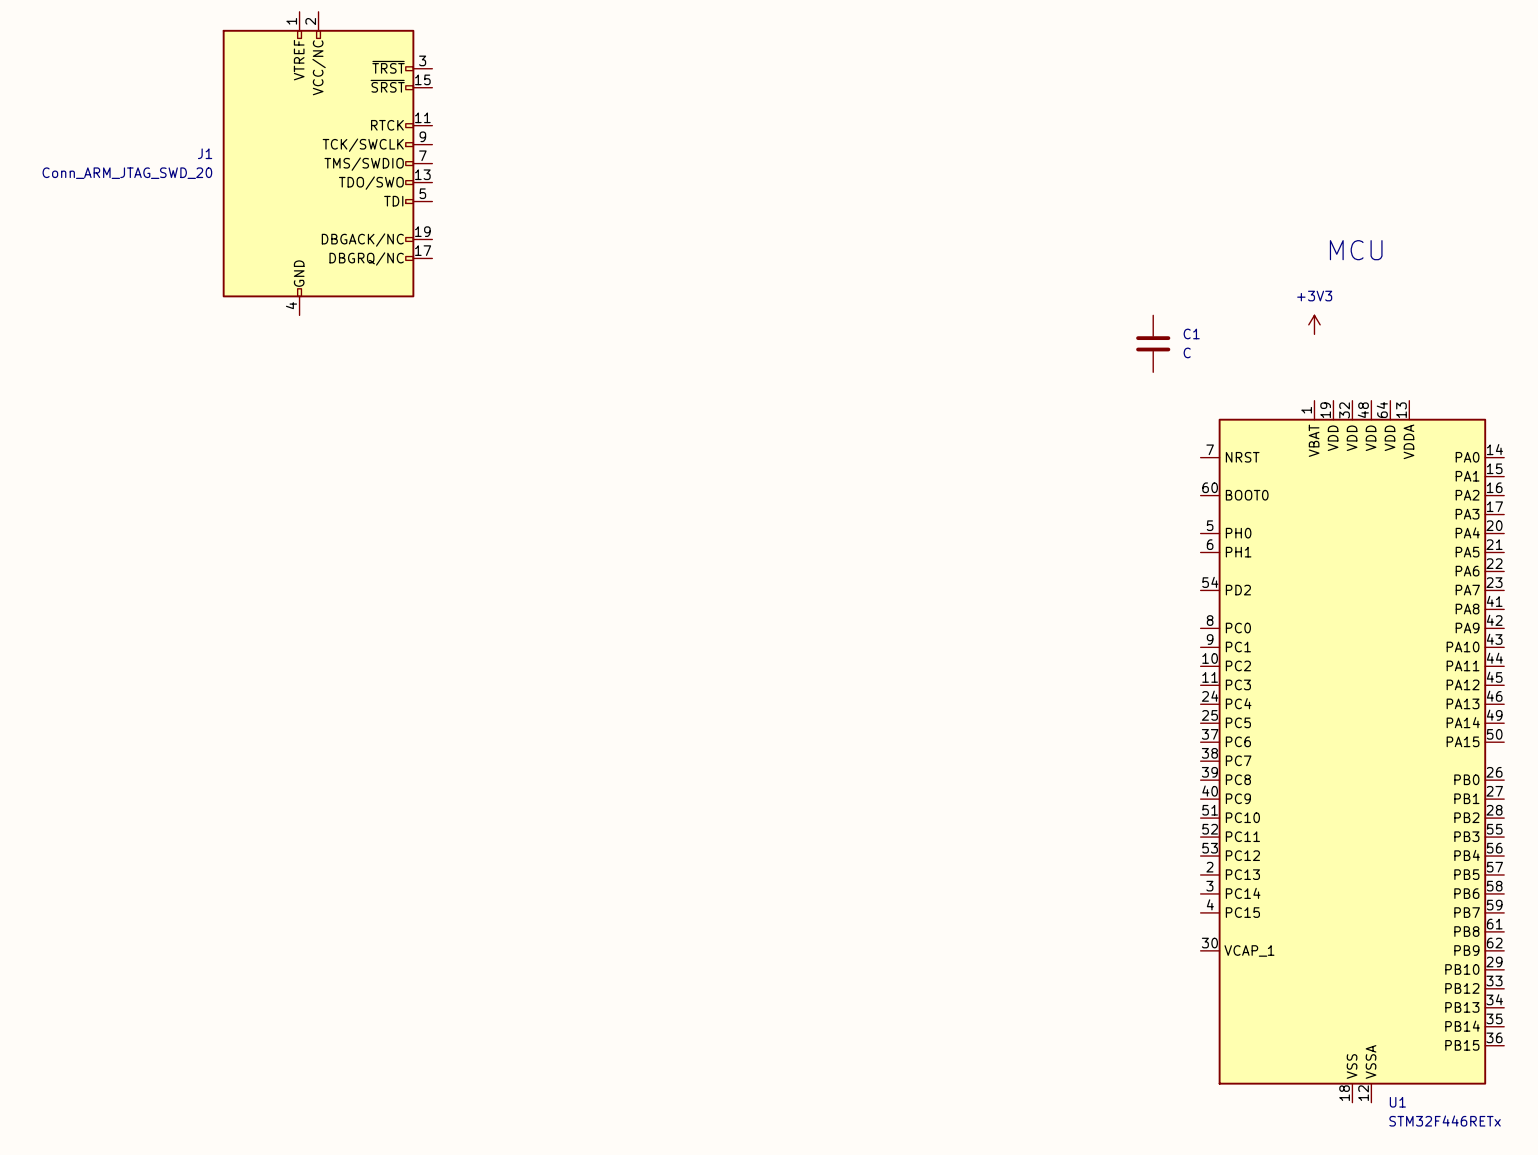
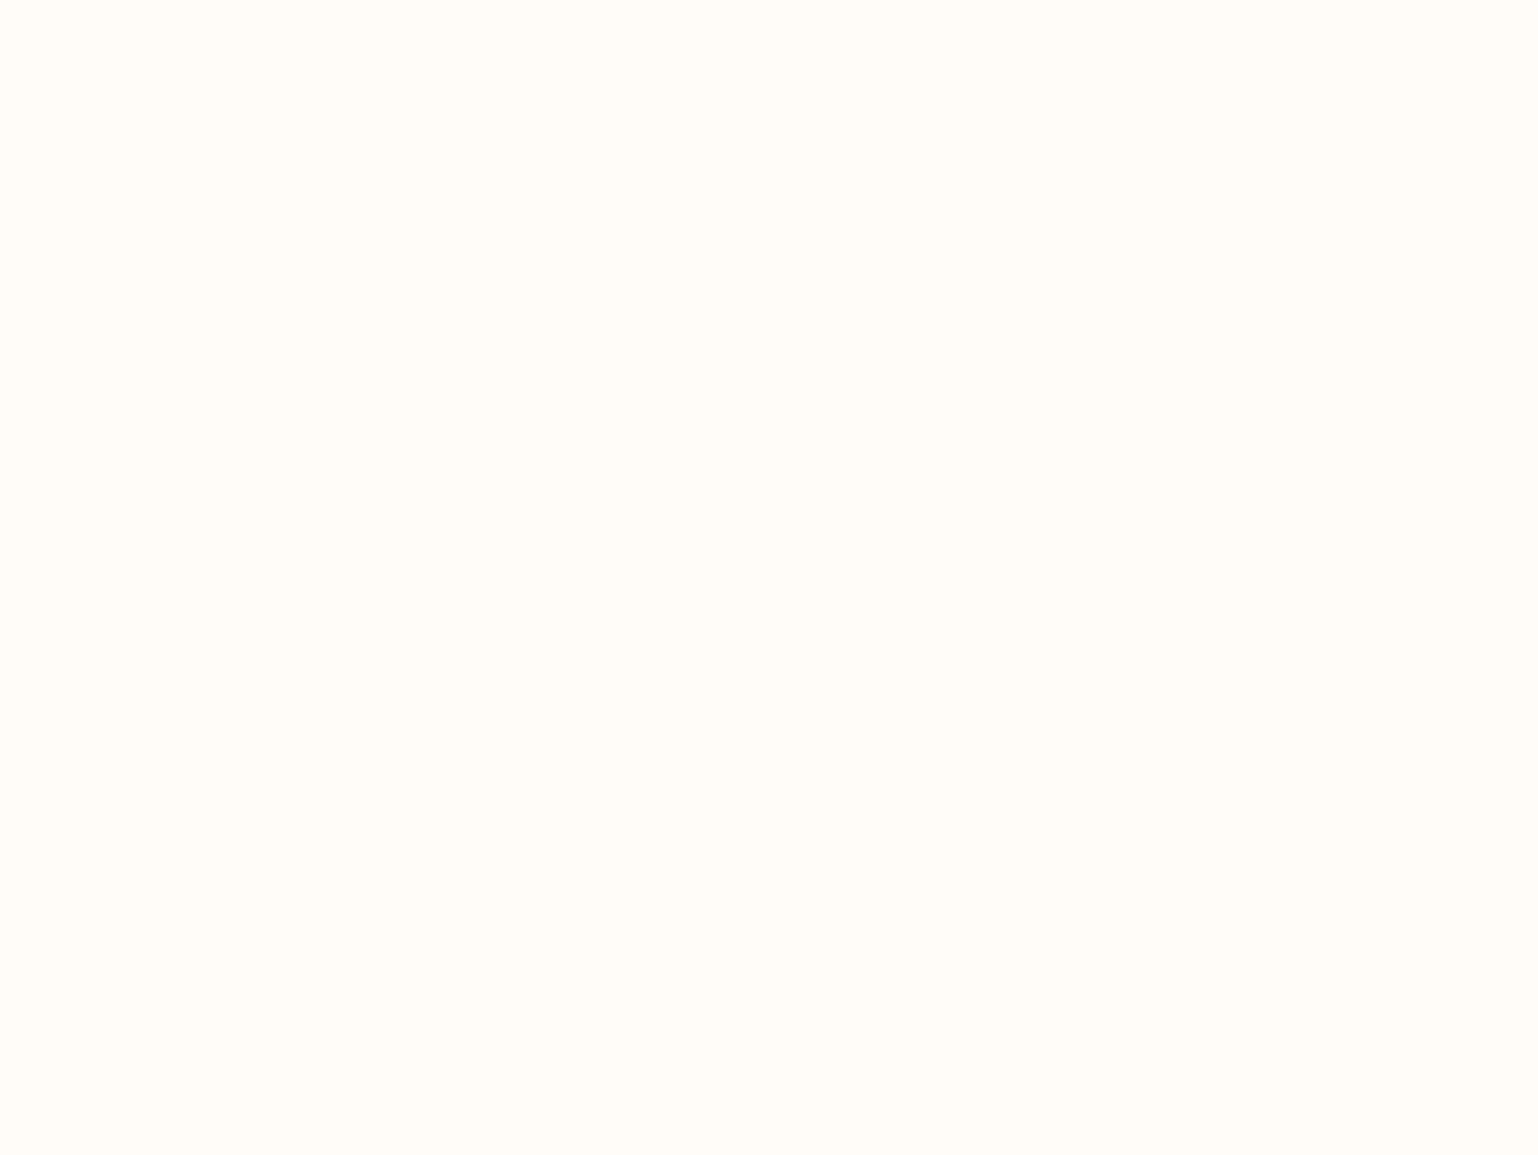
J1: Conn_ARM_JTAG_SWD_20 (327, 163) -> none
text: MCU (1356, 250) -> none
power symbol: +3V3 (1314, 324) -> none
C1: C (1153, 343) -> none
U1: STM32F446RETx (1352, 751) -> none

